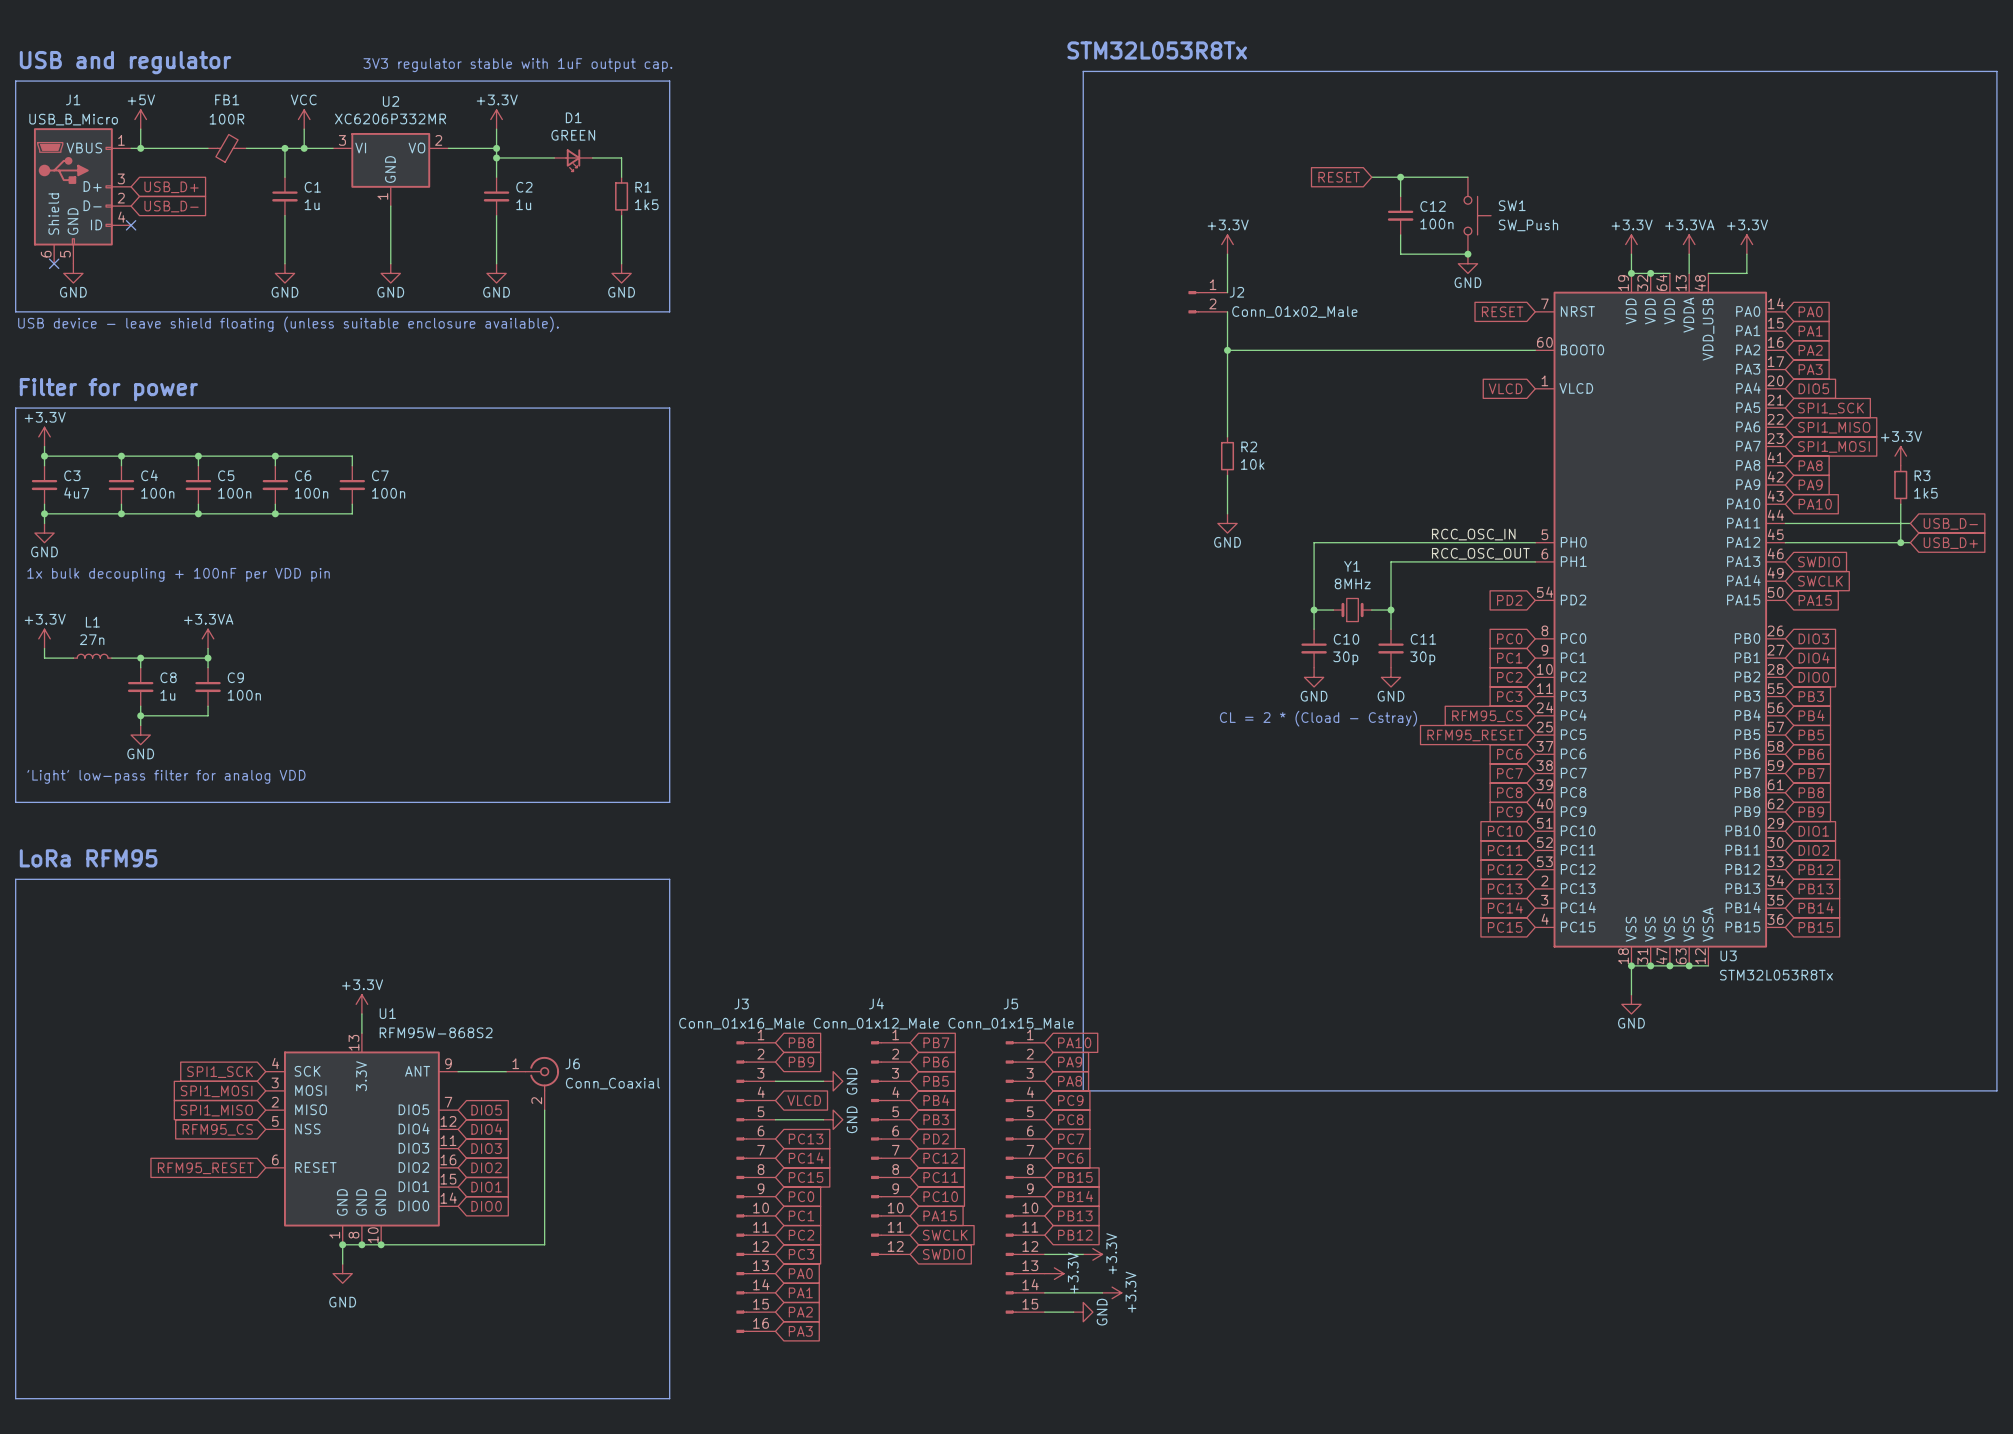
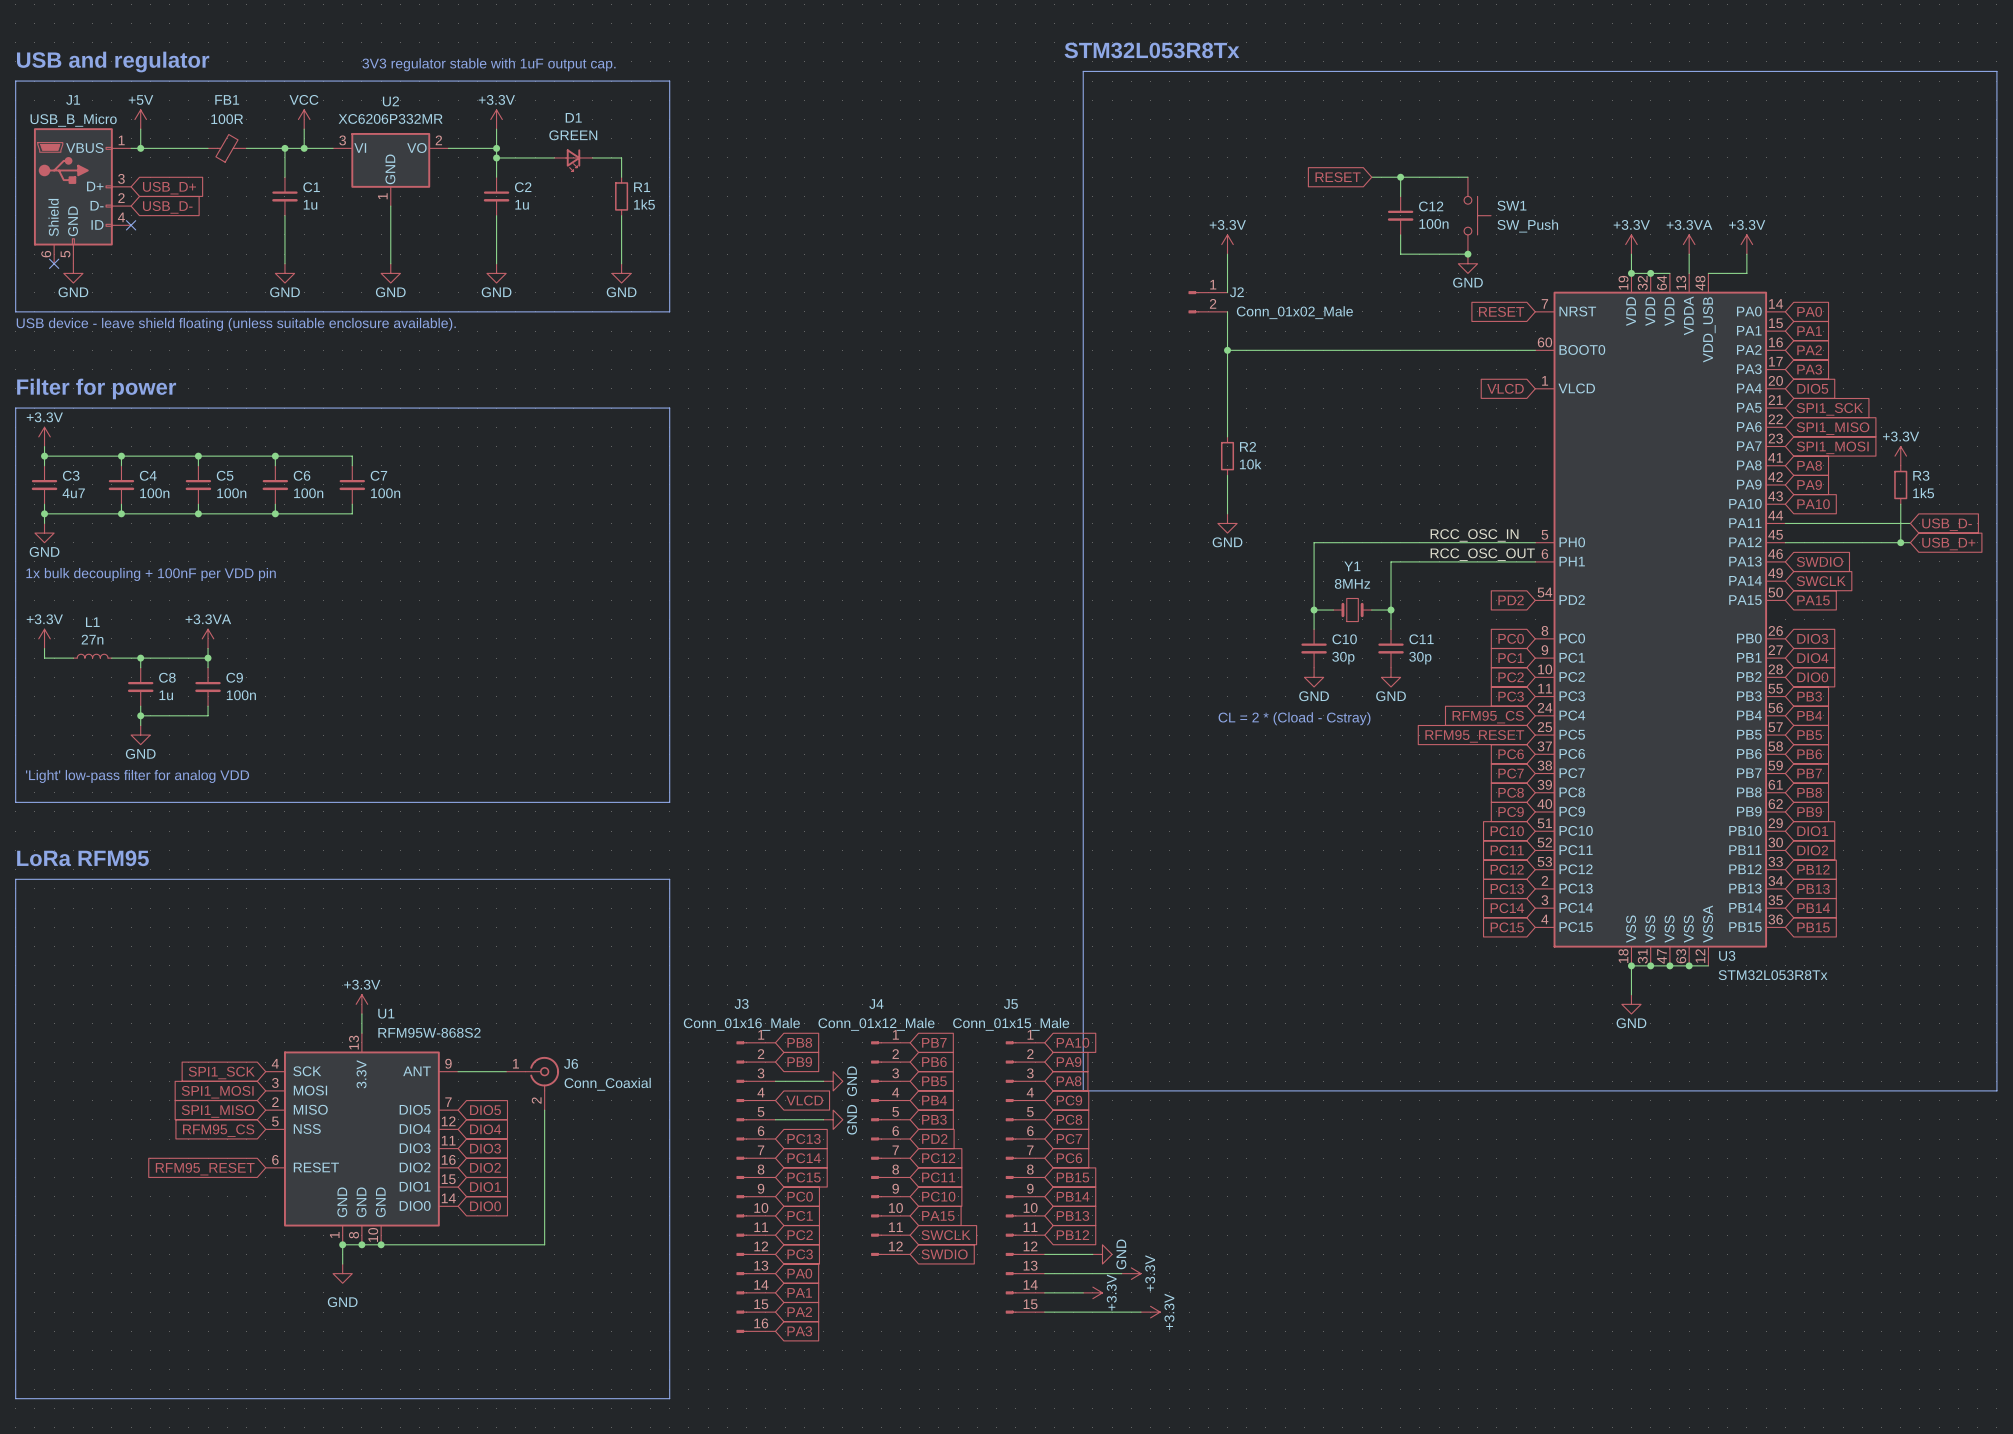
power symbol: +3.3V (1092, 1254) -> none
wire: none -> (1044, 1273) (1121, 1273)
power symbol: +3.3V (1054, 1273) -> none
power symbol: none -> +3.3V (1131, 1273)
power symbol: none -> +3.3V (1092, 1292)
power symbol: +3.3V (1112, 1292) -> none
wire: none -> (1073, 1312) (1140, 1312)
power symbol position: GND (1083, 1312) -> GND (1102, 1254)
power symbol: none -> +3.3V (1150, 1312)

